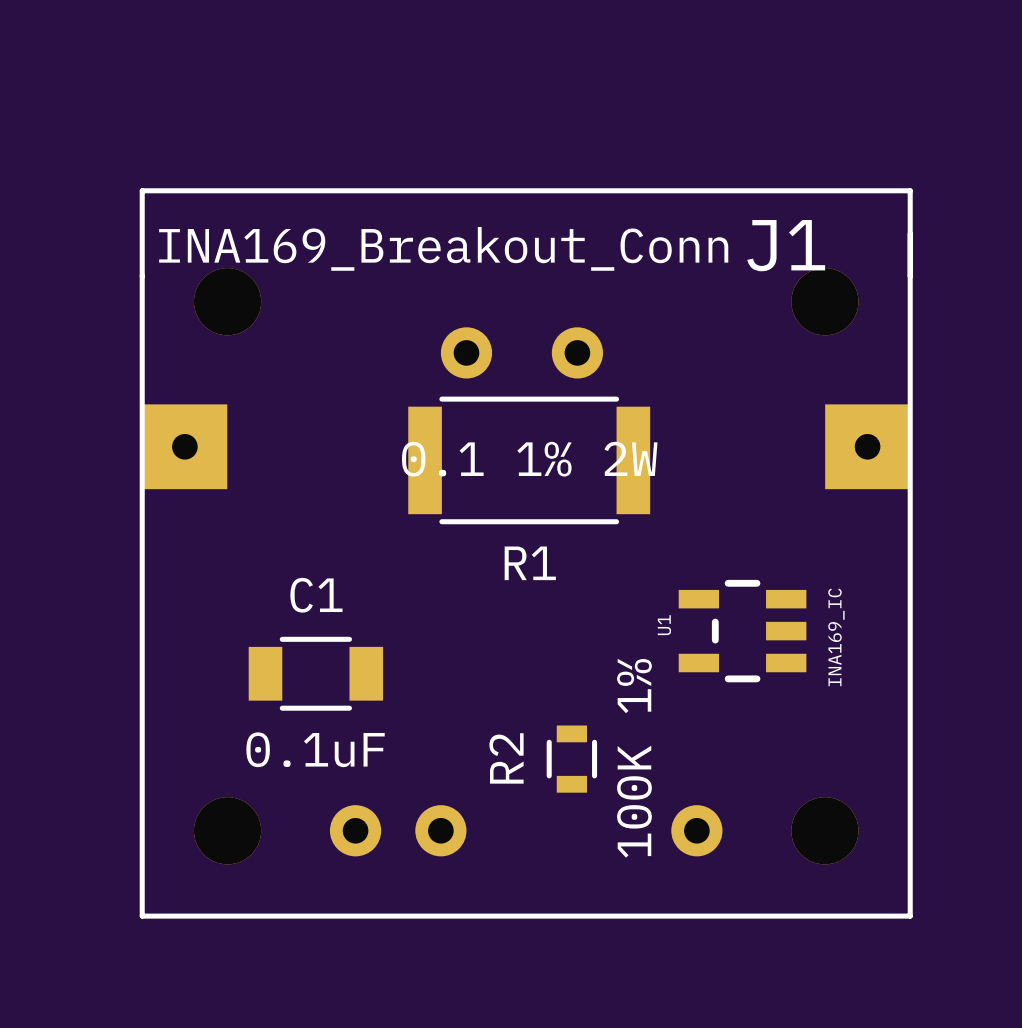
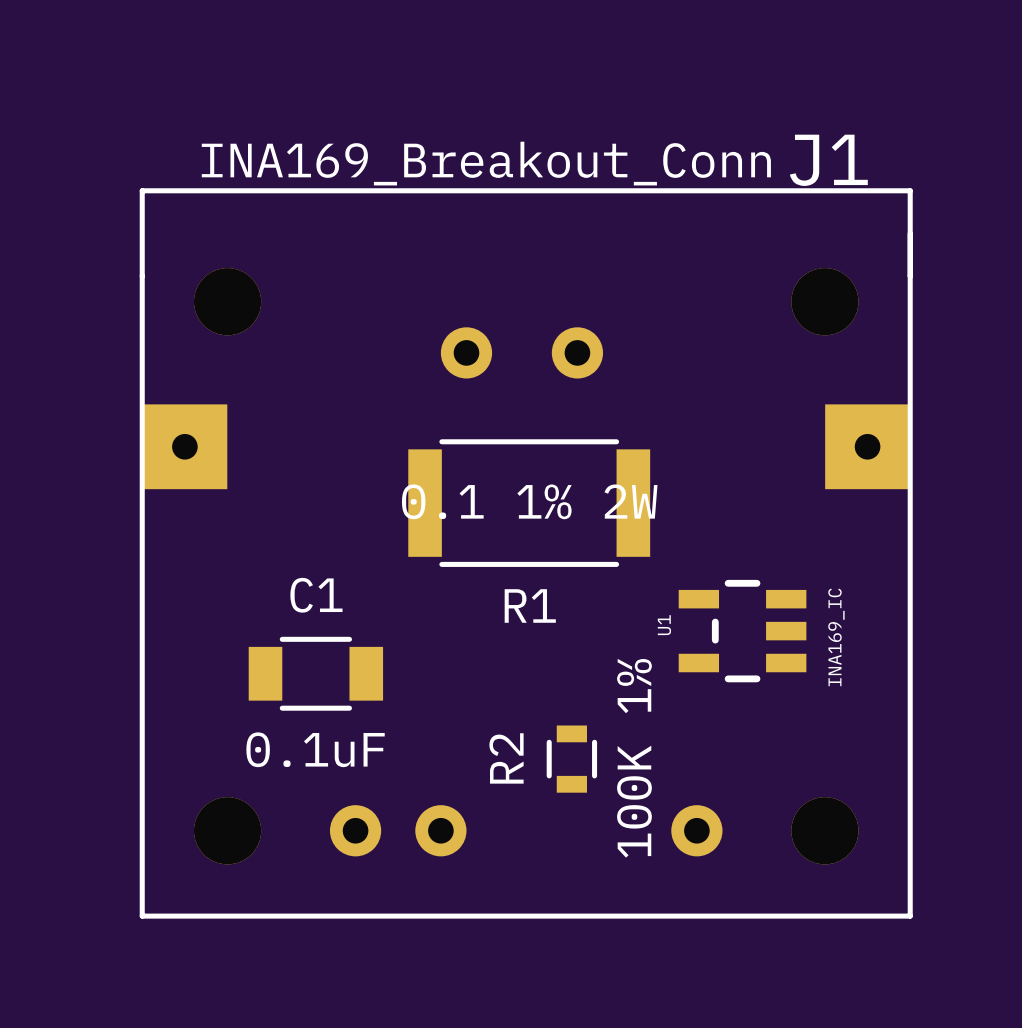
J1 name position: J1 (786, 245) -> J1 (828, 160)
J1 value position: INA169_Breakout_Conn (443, 248) -> INA169_Breakout_Conn (486, 163)
R1 position: (529, 460) -> (529, 503)

